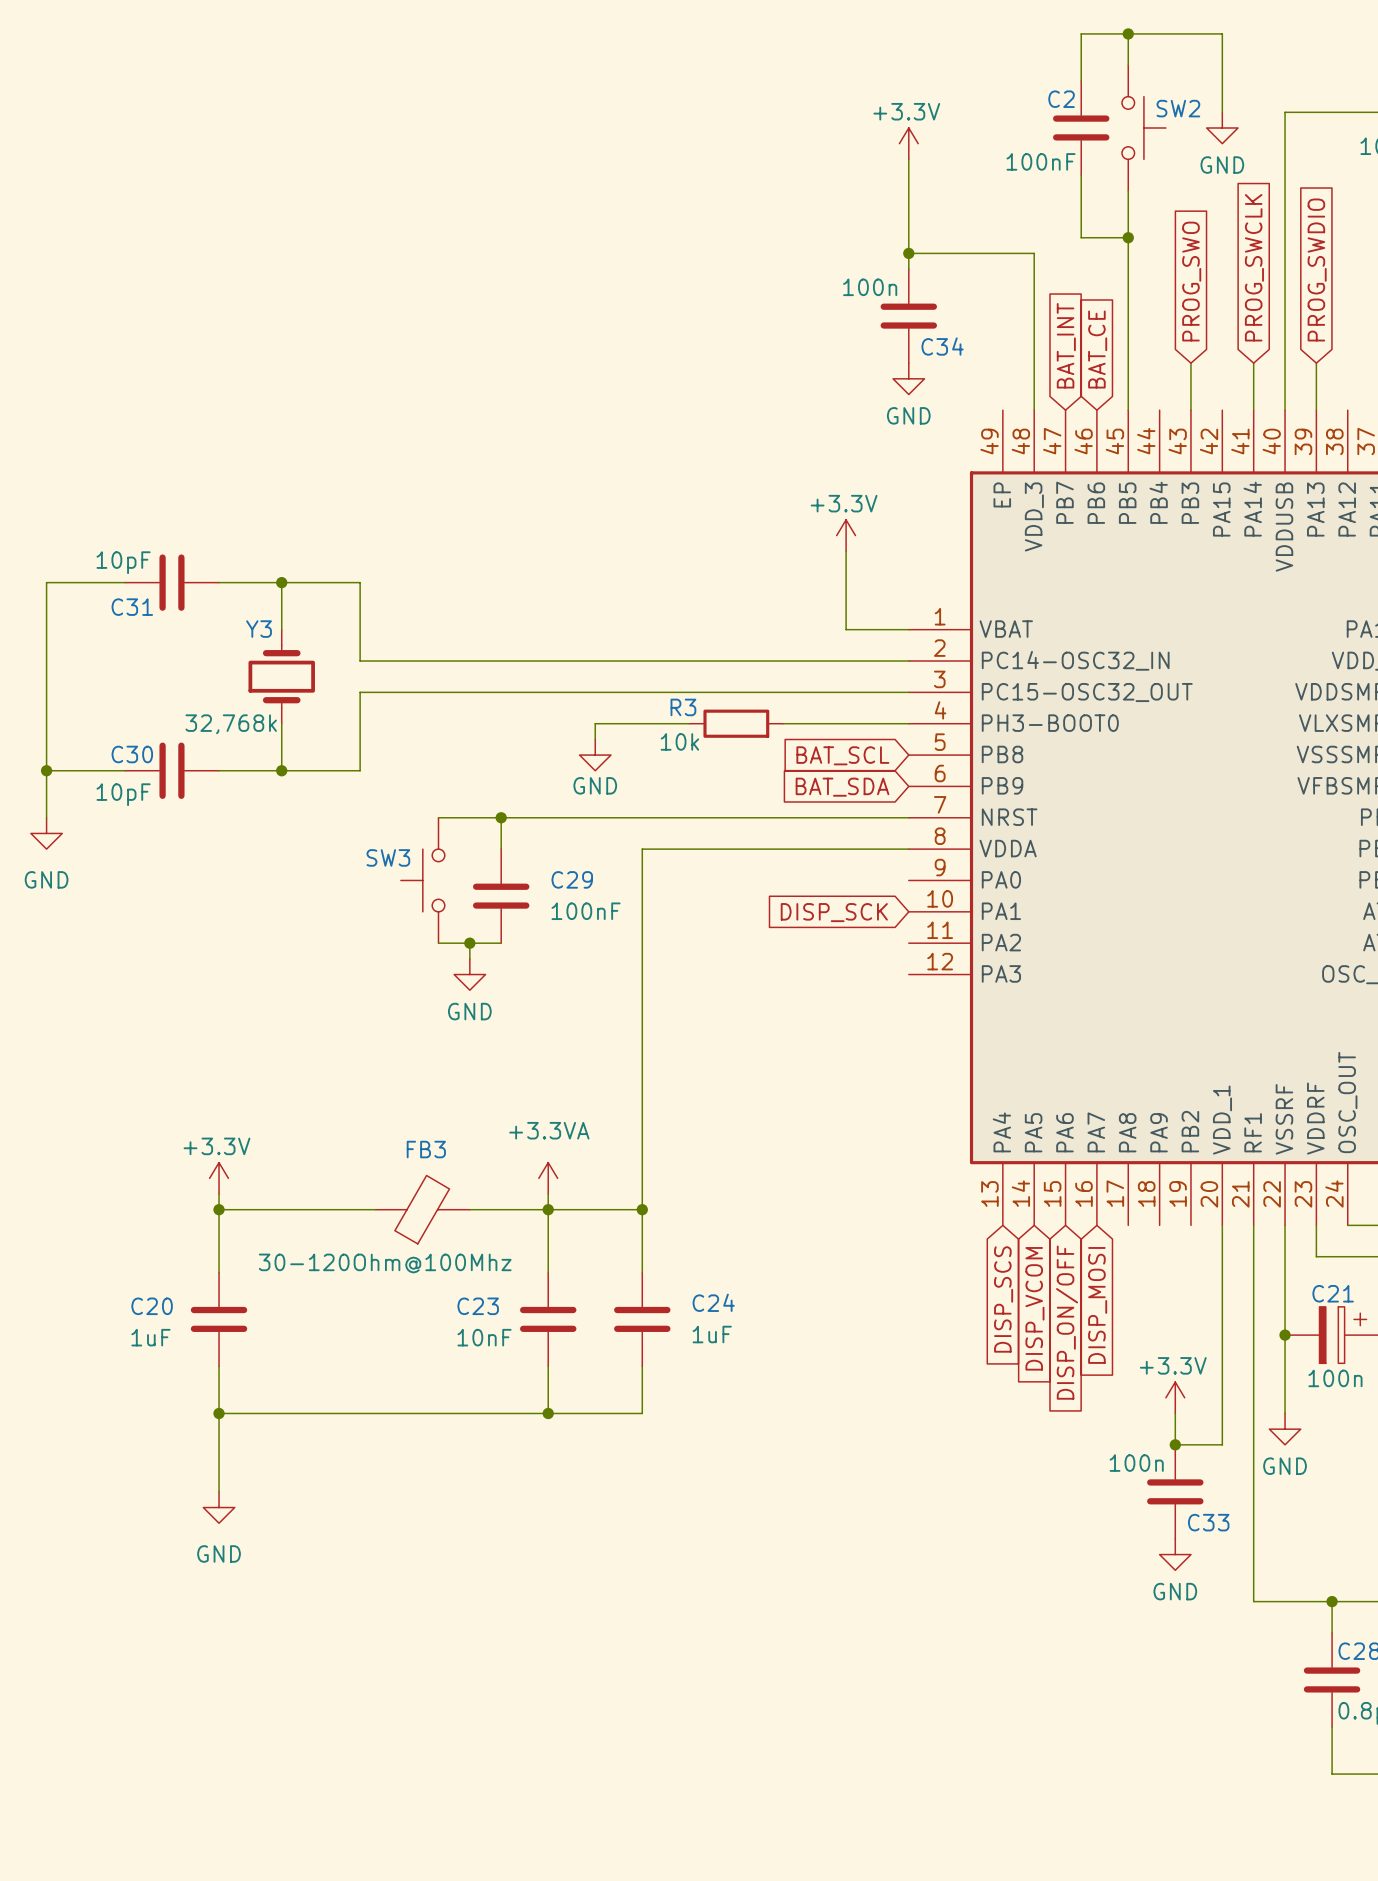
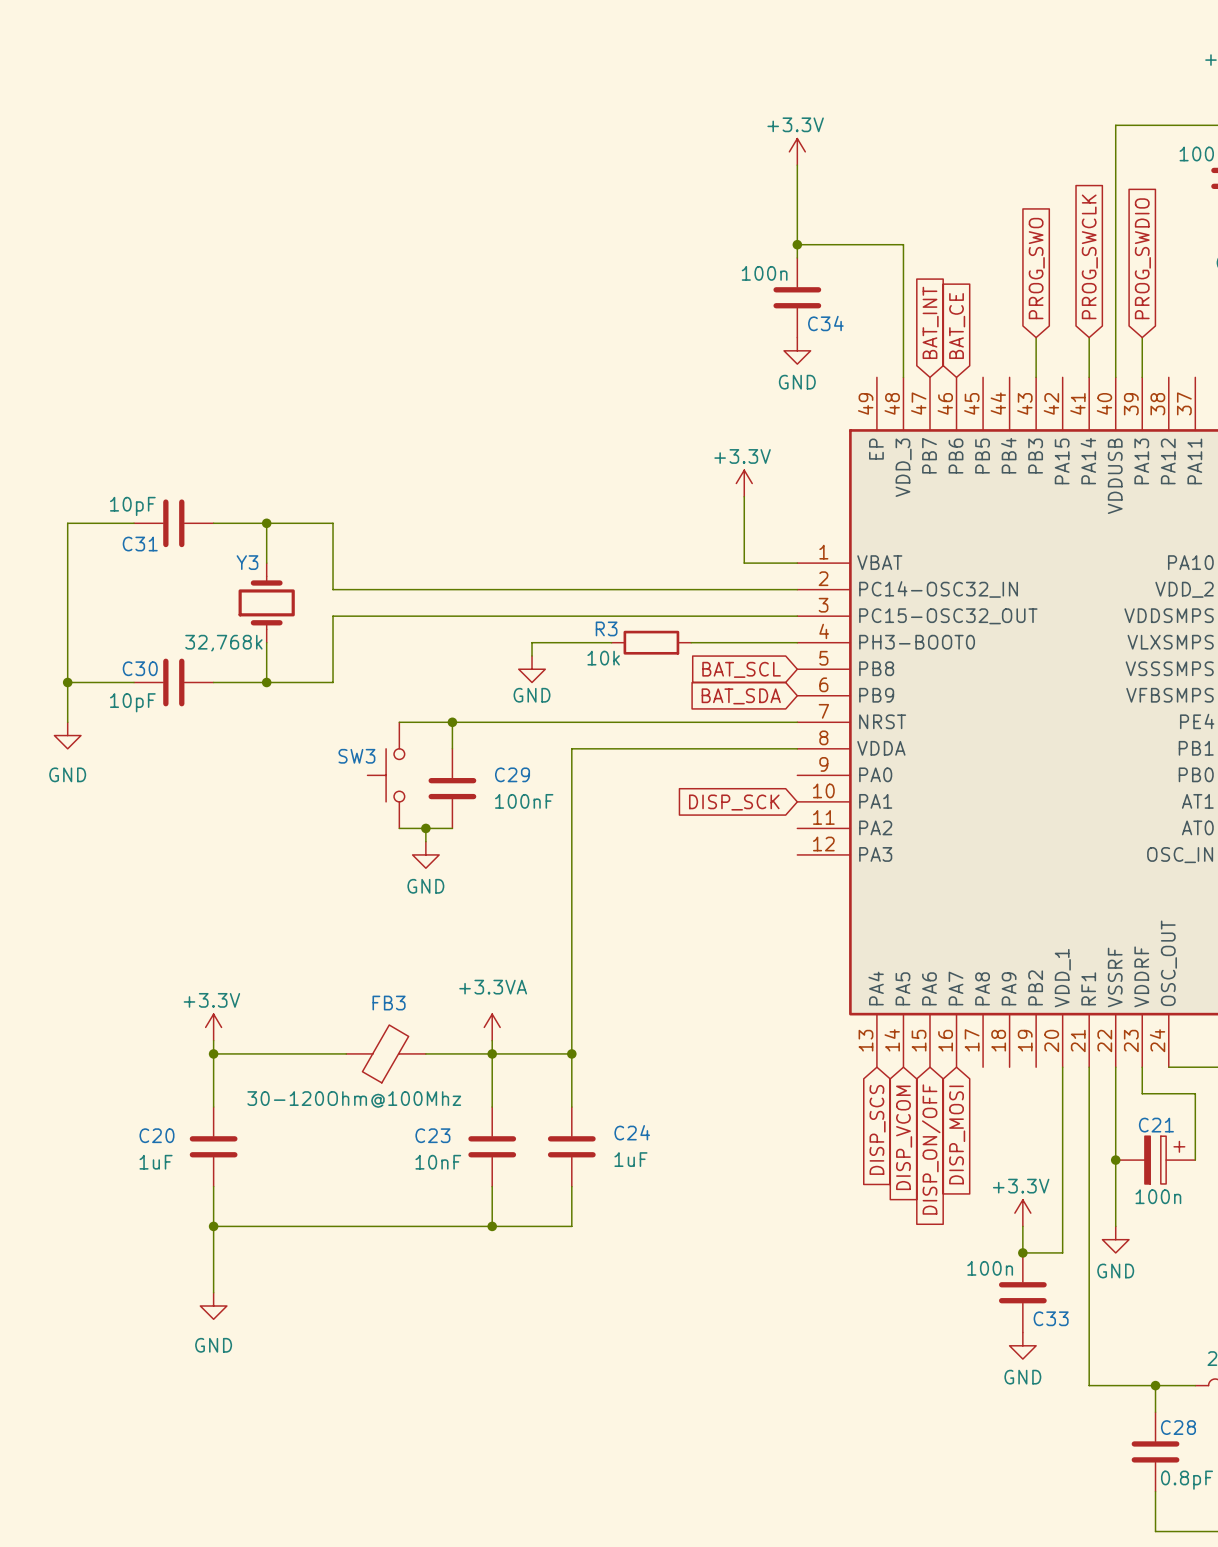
wire: (1128, 33) (1128, 65) -> none
junction: (1128, 33) -> none
wire: (1081, 80) (1081, 33) (1222, 33) (1222, 112) -> none
C2: 100nF (1081, 128) -> none
SW2: (1143, 128) -> none
power symbol: GND (1222, 128) -> none
wire: (1081, 175) (1081, 237) (1128, 237) -> none
wire: (1128, 190) (1128, 410) -> none
junction: (1128, 237) -> none

